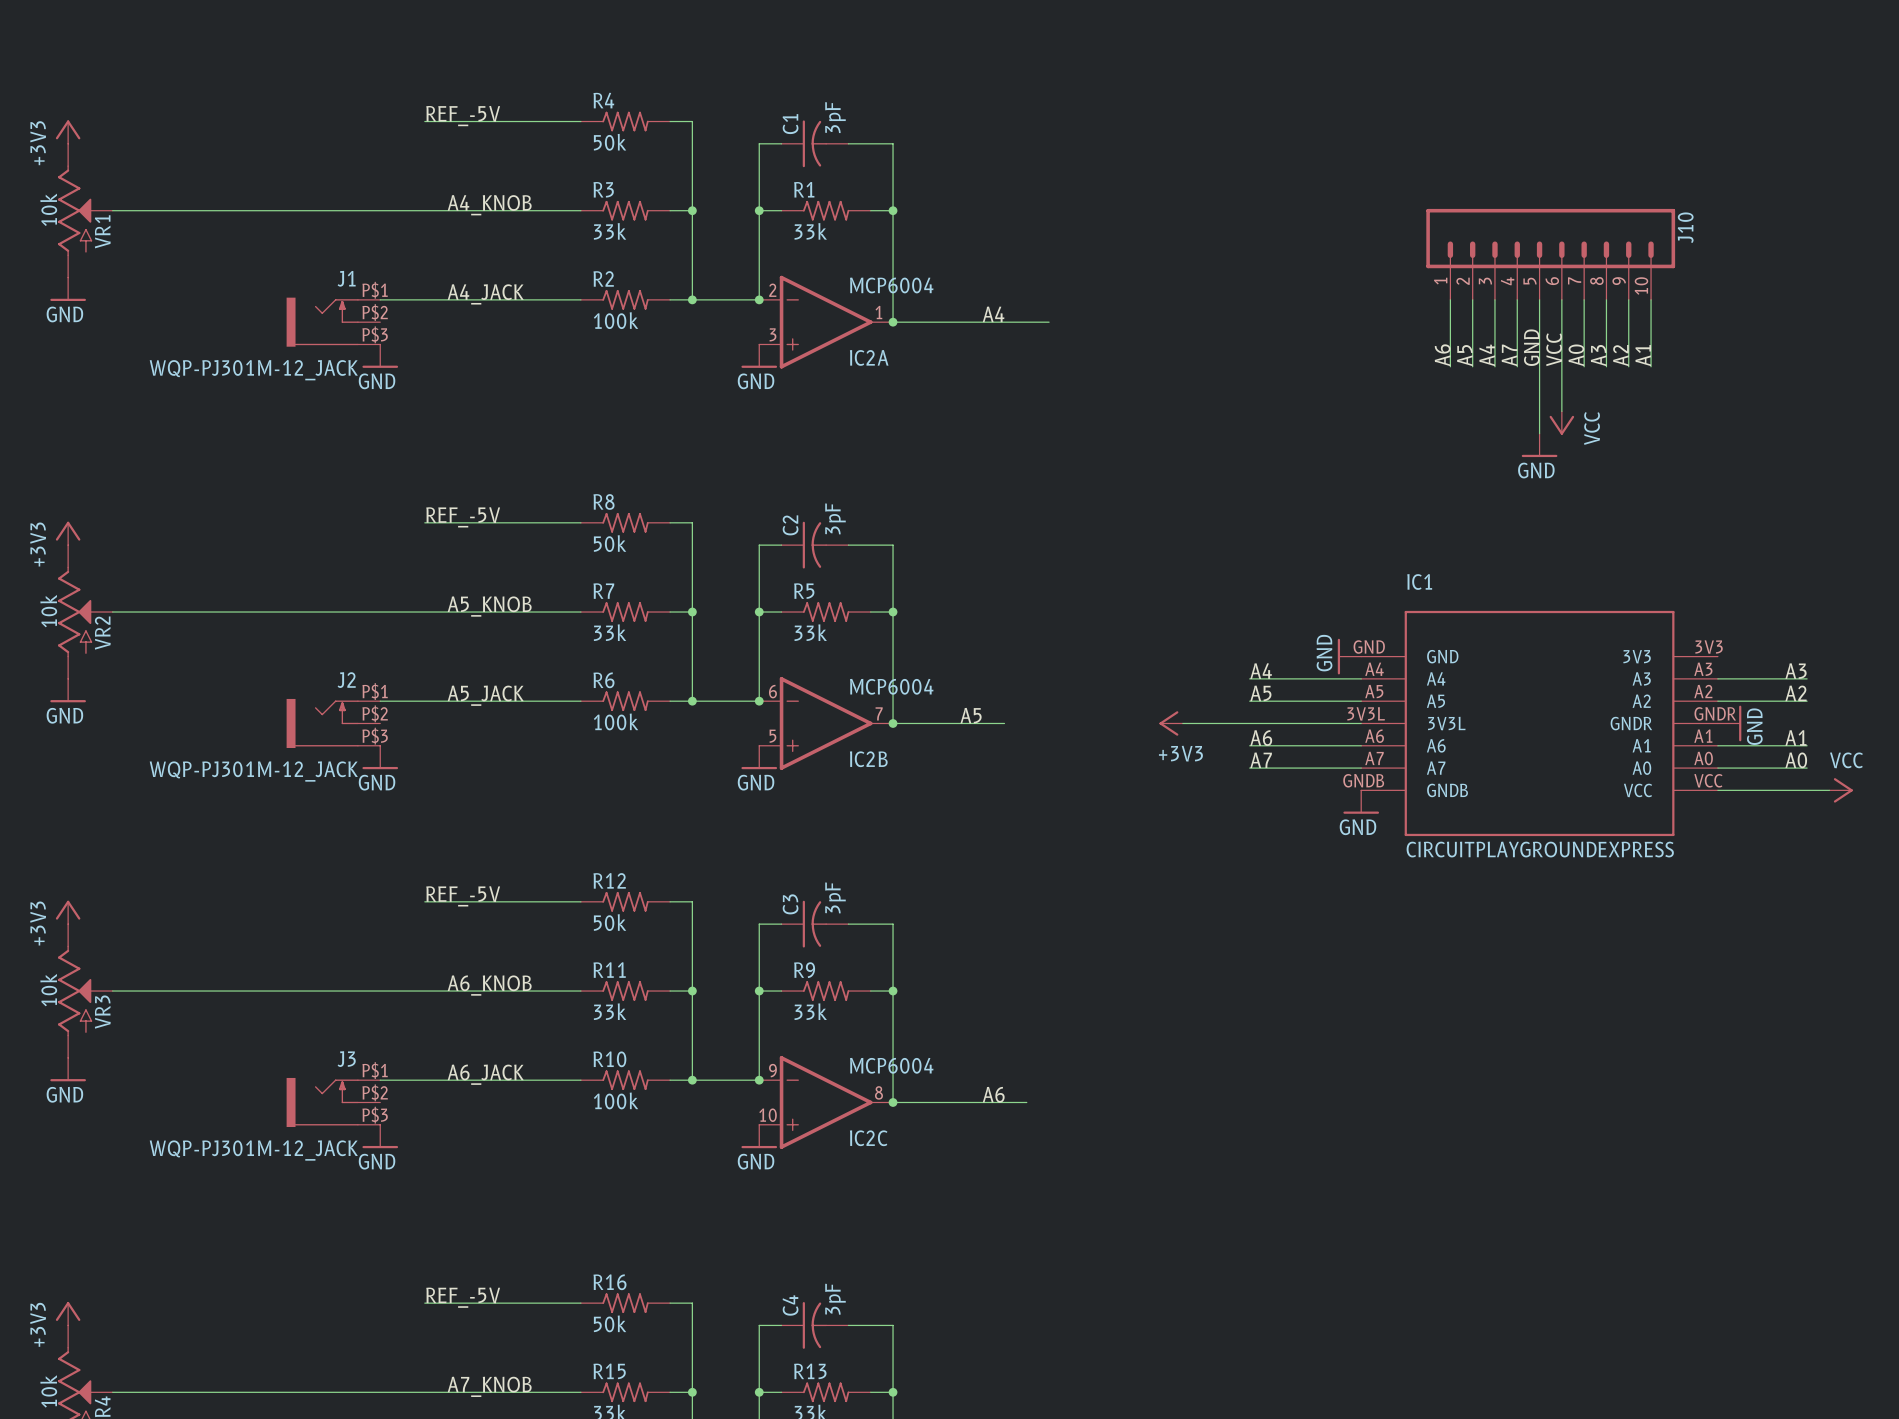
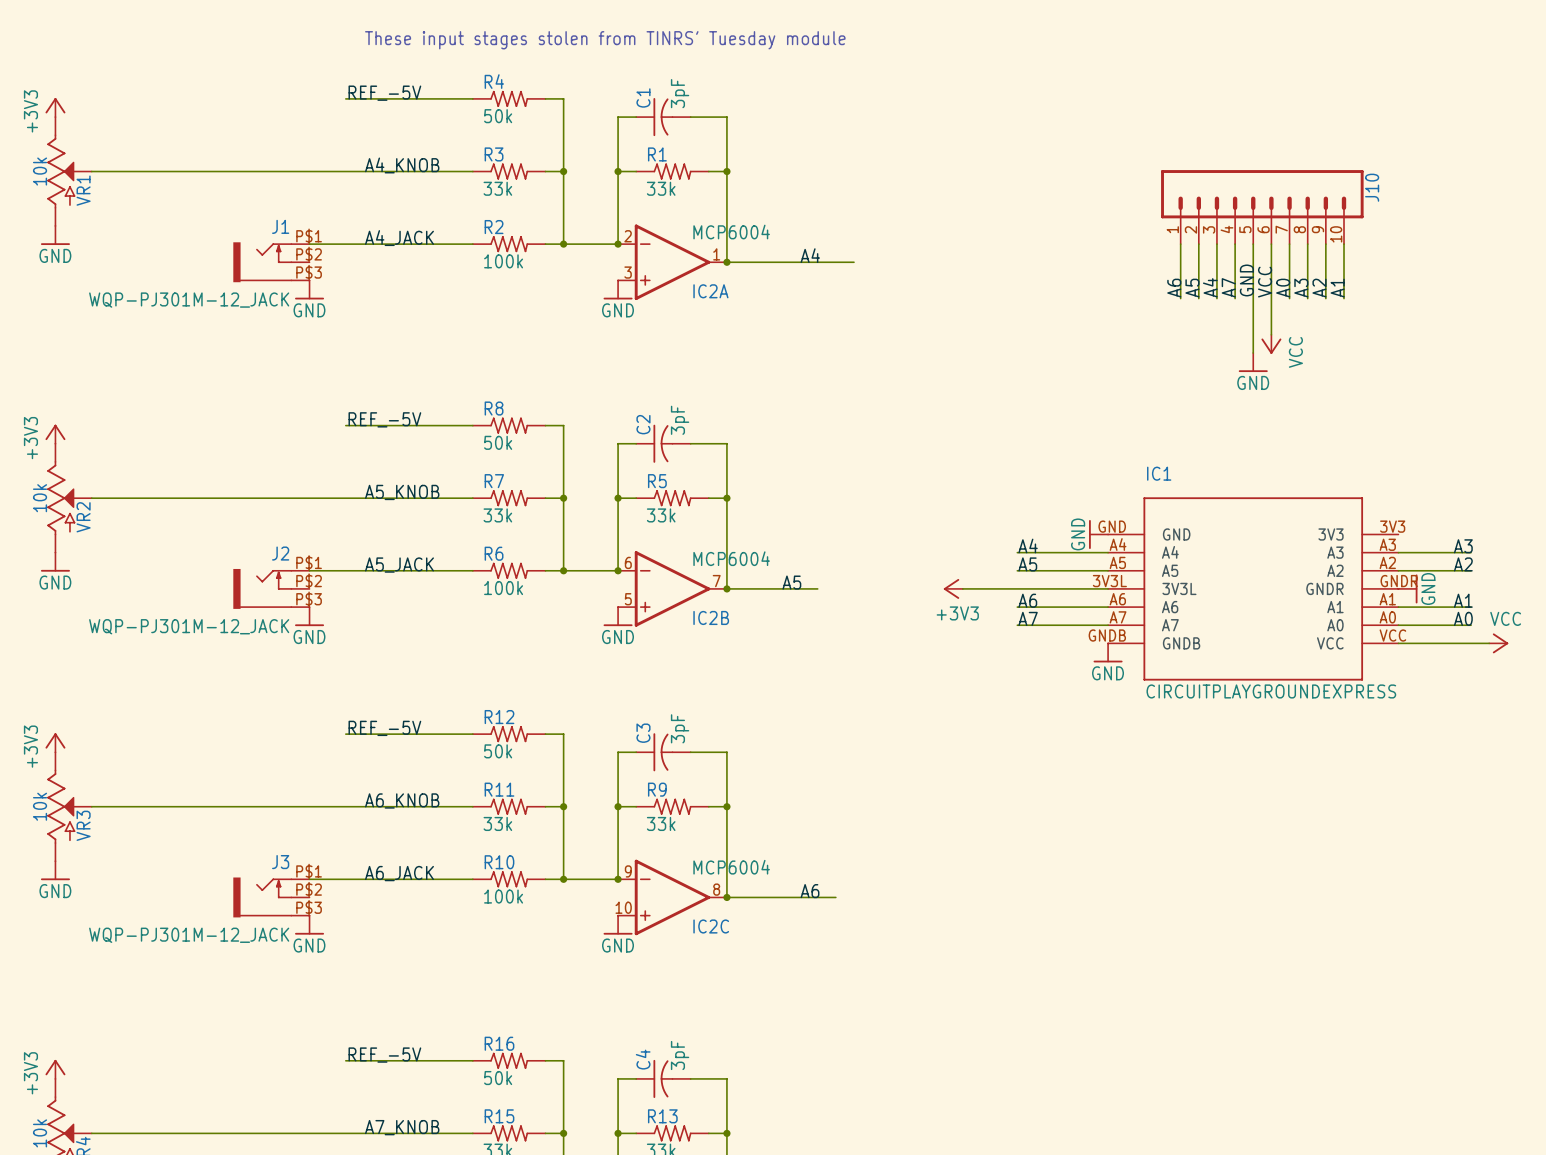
text: none -> These input stages stolen from TINRS' Tuesday module (605, 40)

